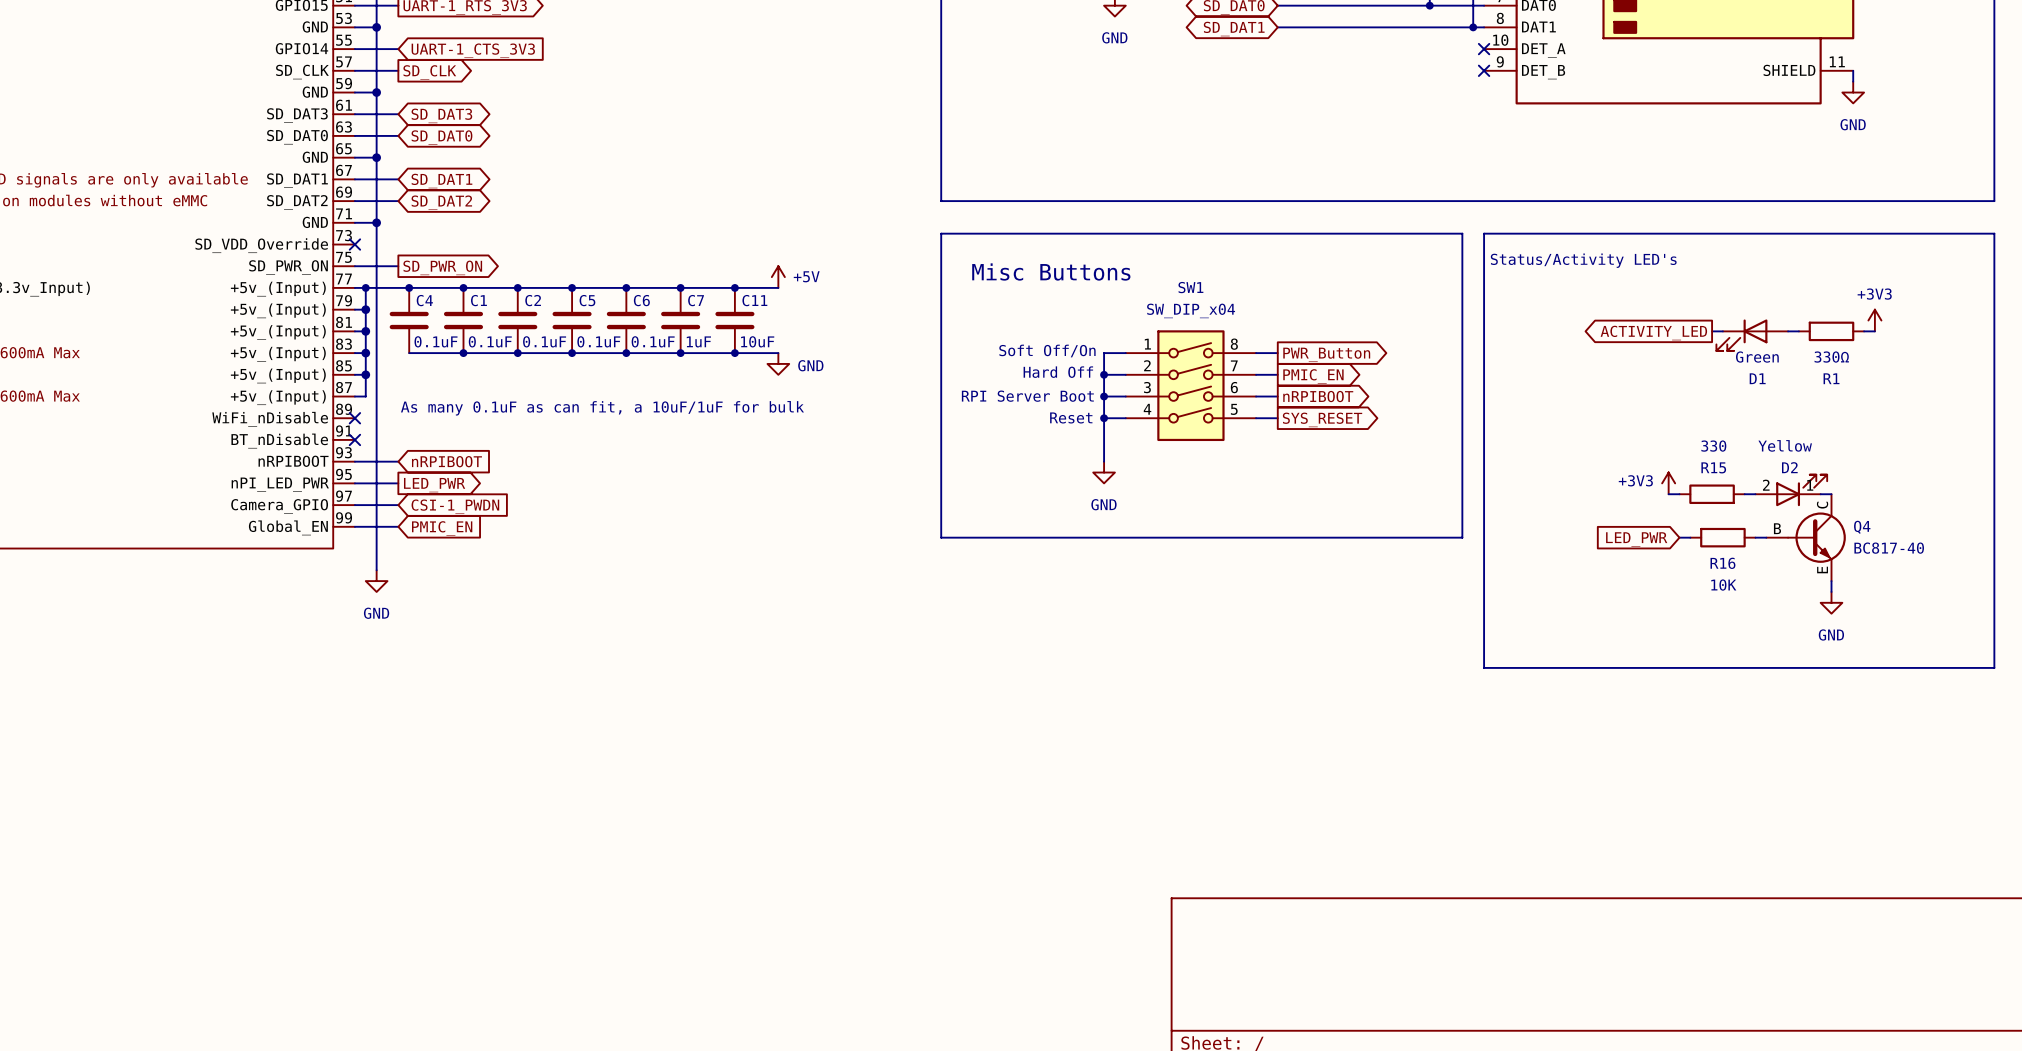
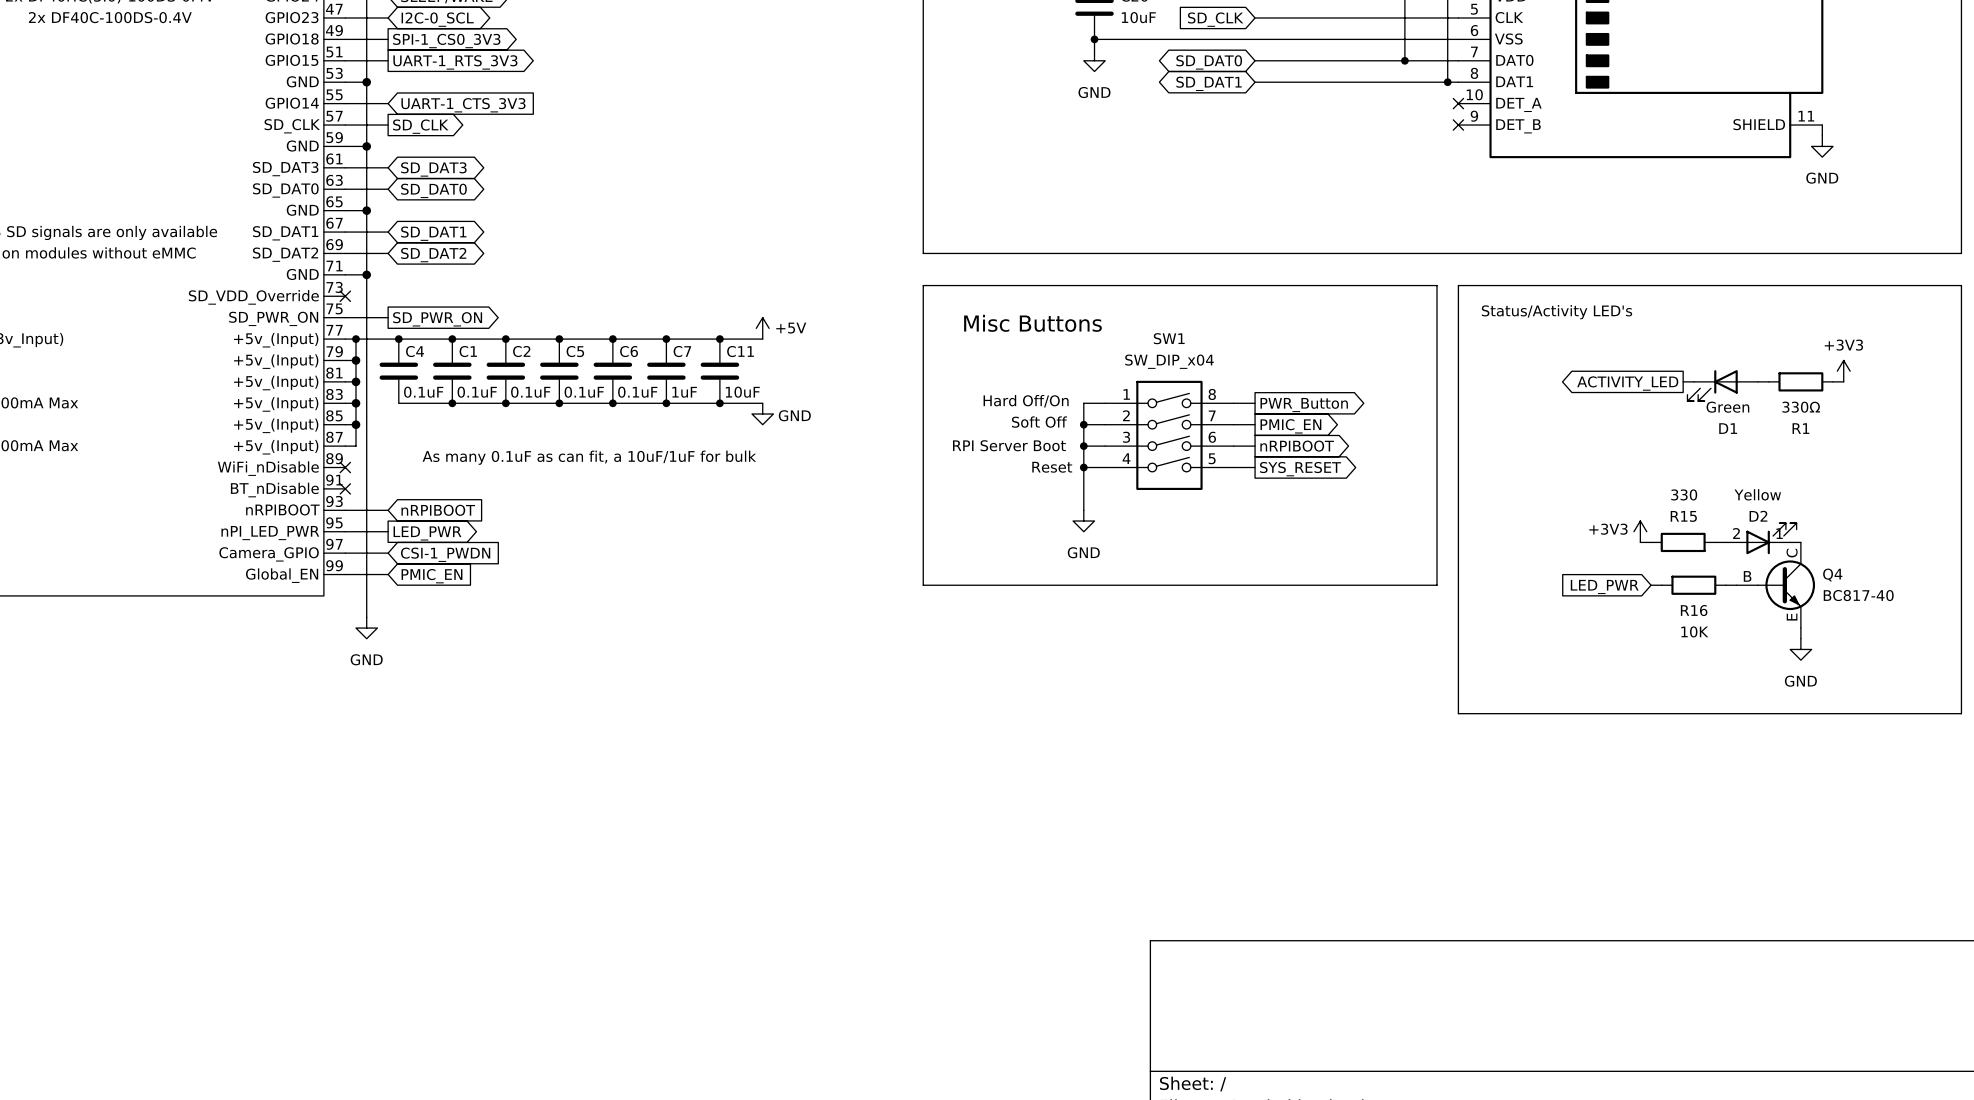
text: Soft Off/On (1047, 351) -> Hard Off/On (1026, 401)
text: Hard Off (1058, 372) -> Soft Off (1039, 422)

